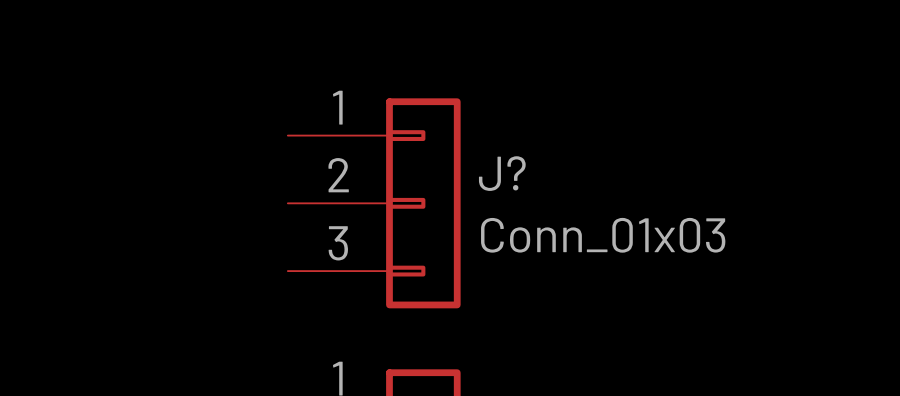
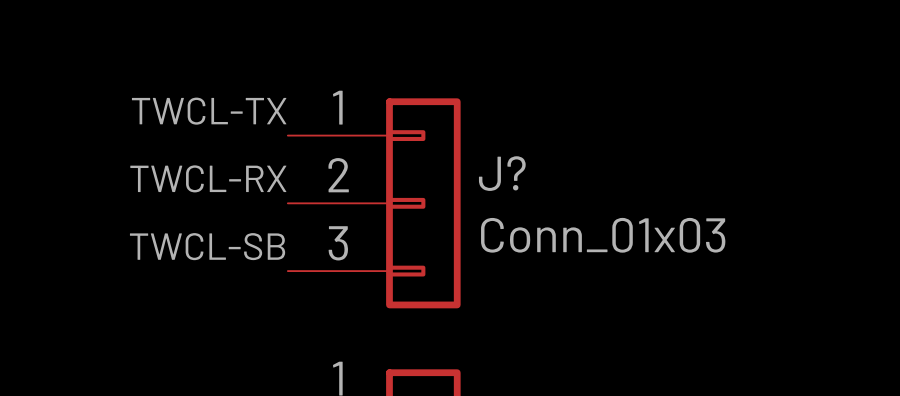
label: none -> TWCL-TX (209, 111)
label: none -> TWCL-RX (208, 178)
label: none -> TWCL-SB (207, 246)

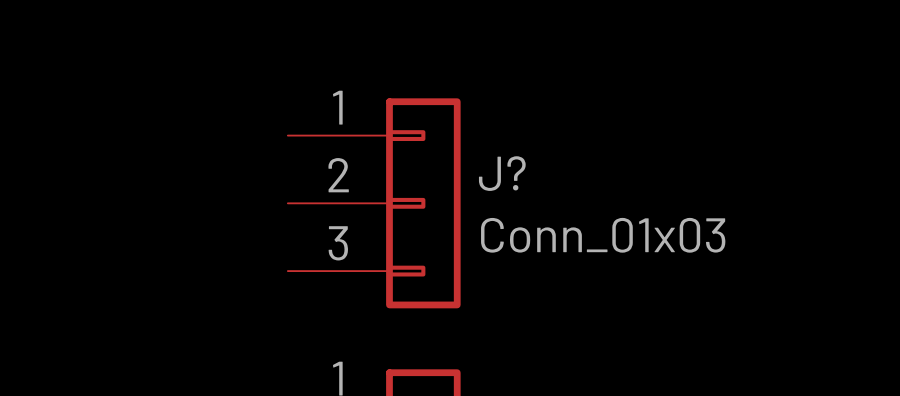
label: TWCL-TX (209, 111) -> none
label: TWCL-RX (208, 178) -> none
label: TWCL-SB (207, 246) -> none

